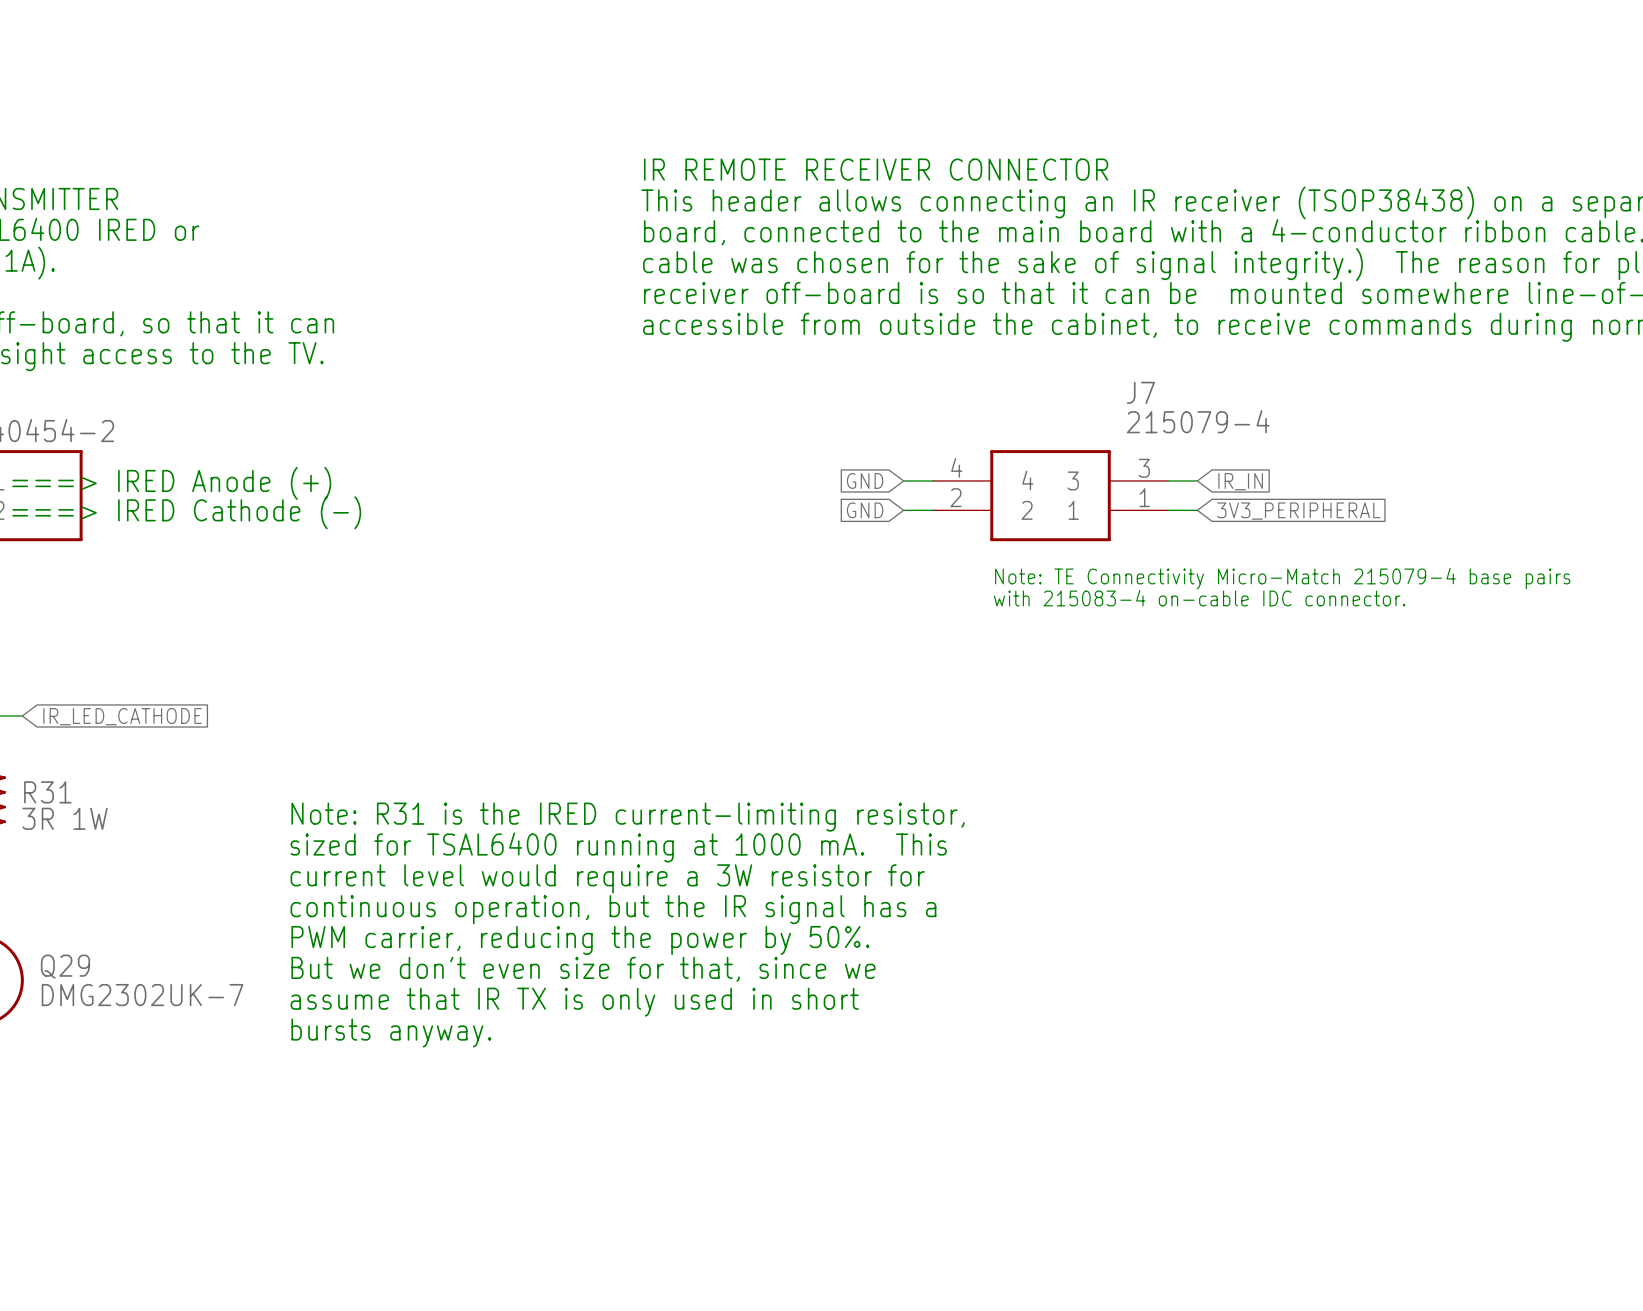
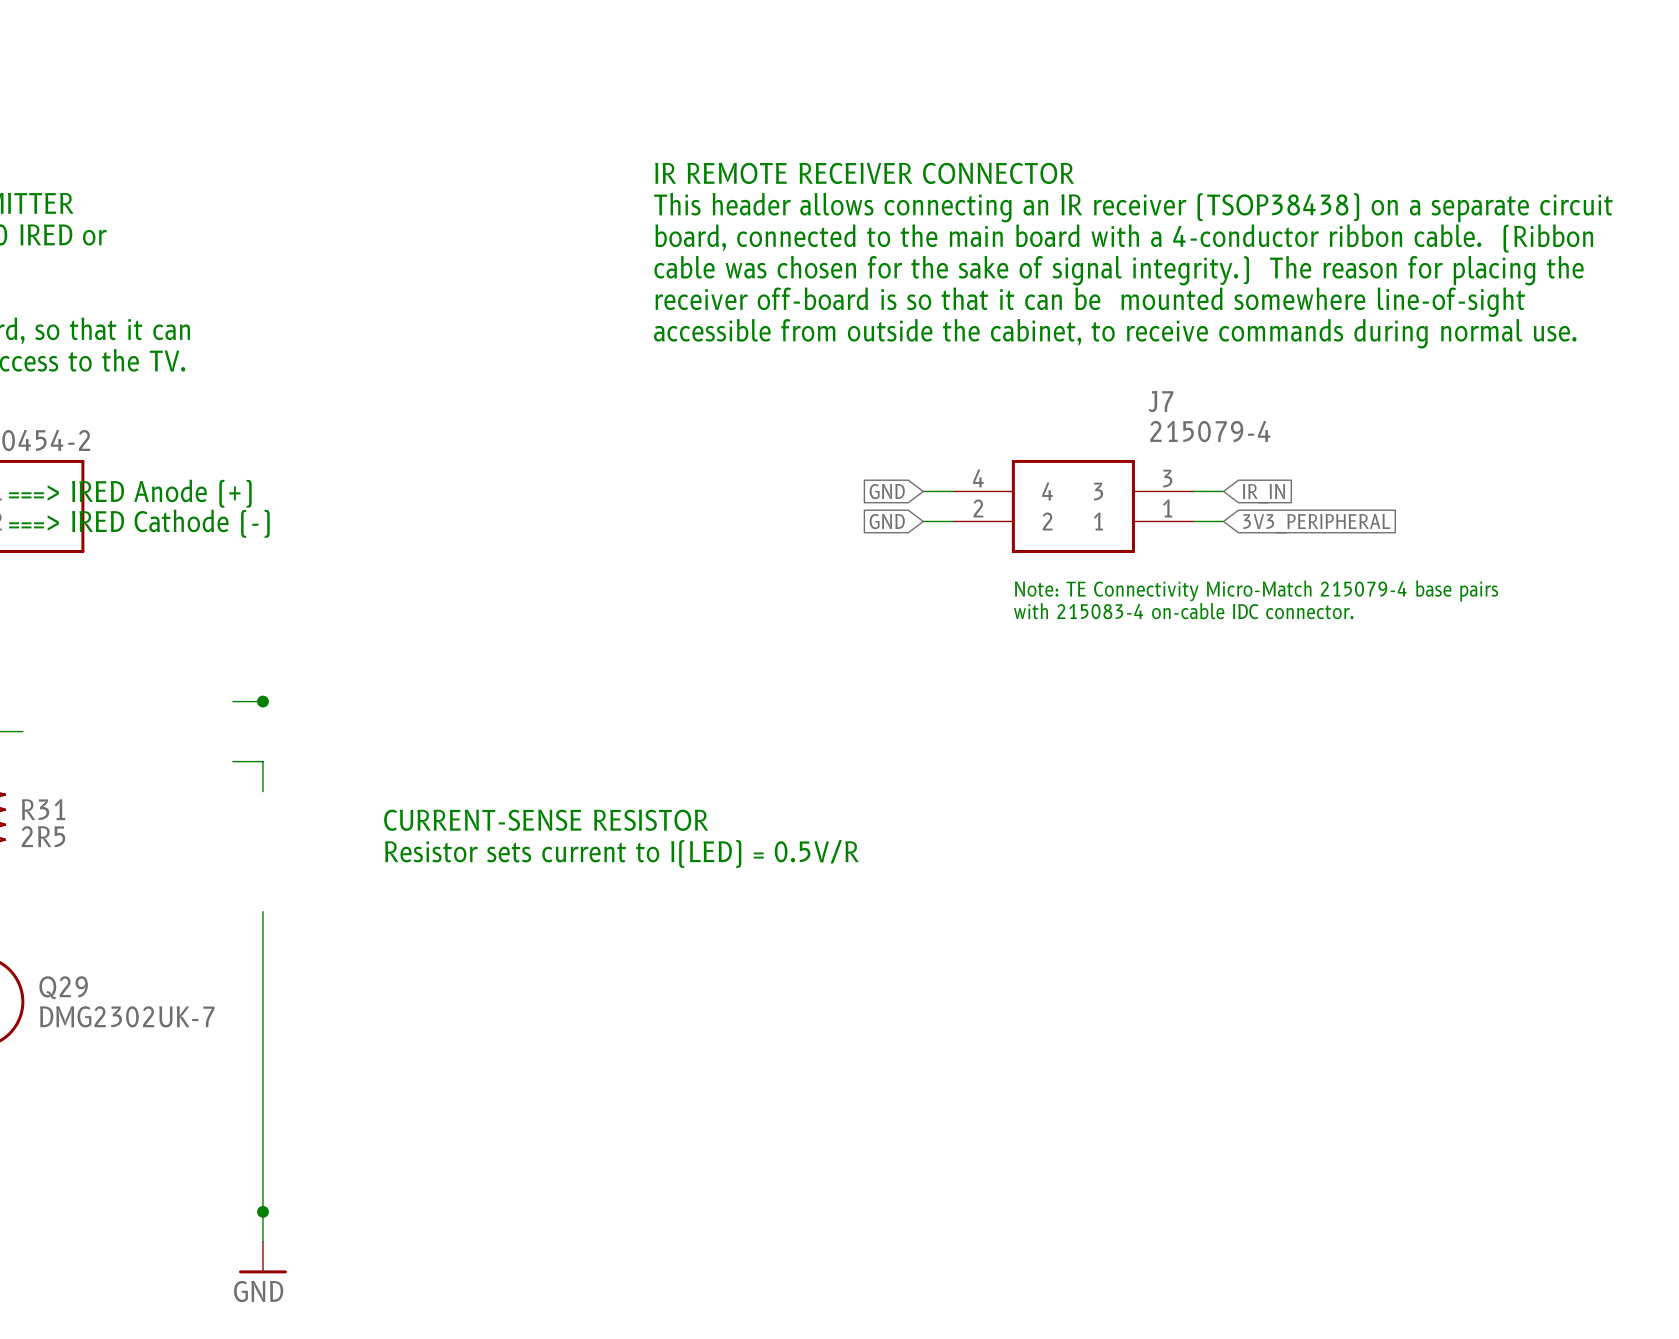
wire: none -> (232, 701) (262, 701)
junction: none -> (262, 701)
global label: IR_LED_CATHODE (122, 716) -> none
wire: none -> (232, 761) (262, 761) (262, 791)
text: none -> CURRENT-SENSE RESISTOR (546, 820)
text: Note: R31 is the IRED current-limiting resistor, (628, 817) -> none
R31 value: 3R 1W (65, 818) -> 2R5 (43, 836)
text: none -> Resistor sets current to I(LED) = 0.5V/R (621, 854)
text: sized for TSAL6400 running at 1000 mA. This (618, 847) -> none
text: current level would require a 3W resistor for (607, 878) -> none
wire: none -> (262, 911) (262, 1241)
text: continuous operation, but the IR signal has a (613, 909) -> none
text: PWM carrier, reducing the power by 50%. (580, 940) -> none
text: But we don't even size for that, since we (583, 969) -> none
text: assume that IR TX is only used in short (574, 1002) -> none
text: bursts anyway. (391, 1033) -> none
junction: none -> (262, 1211)
power symbol: none -> GND (262, 1257)

